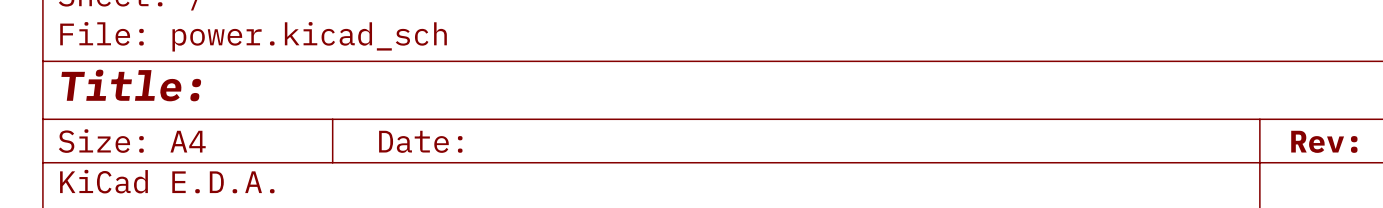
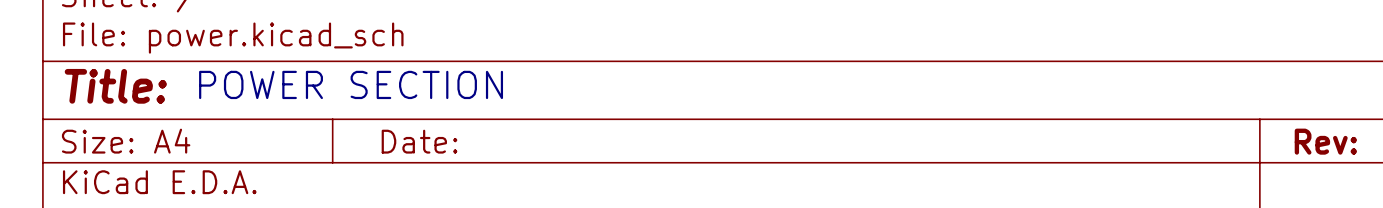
text: none -> POWER SECTION (351, 84)

